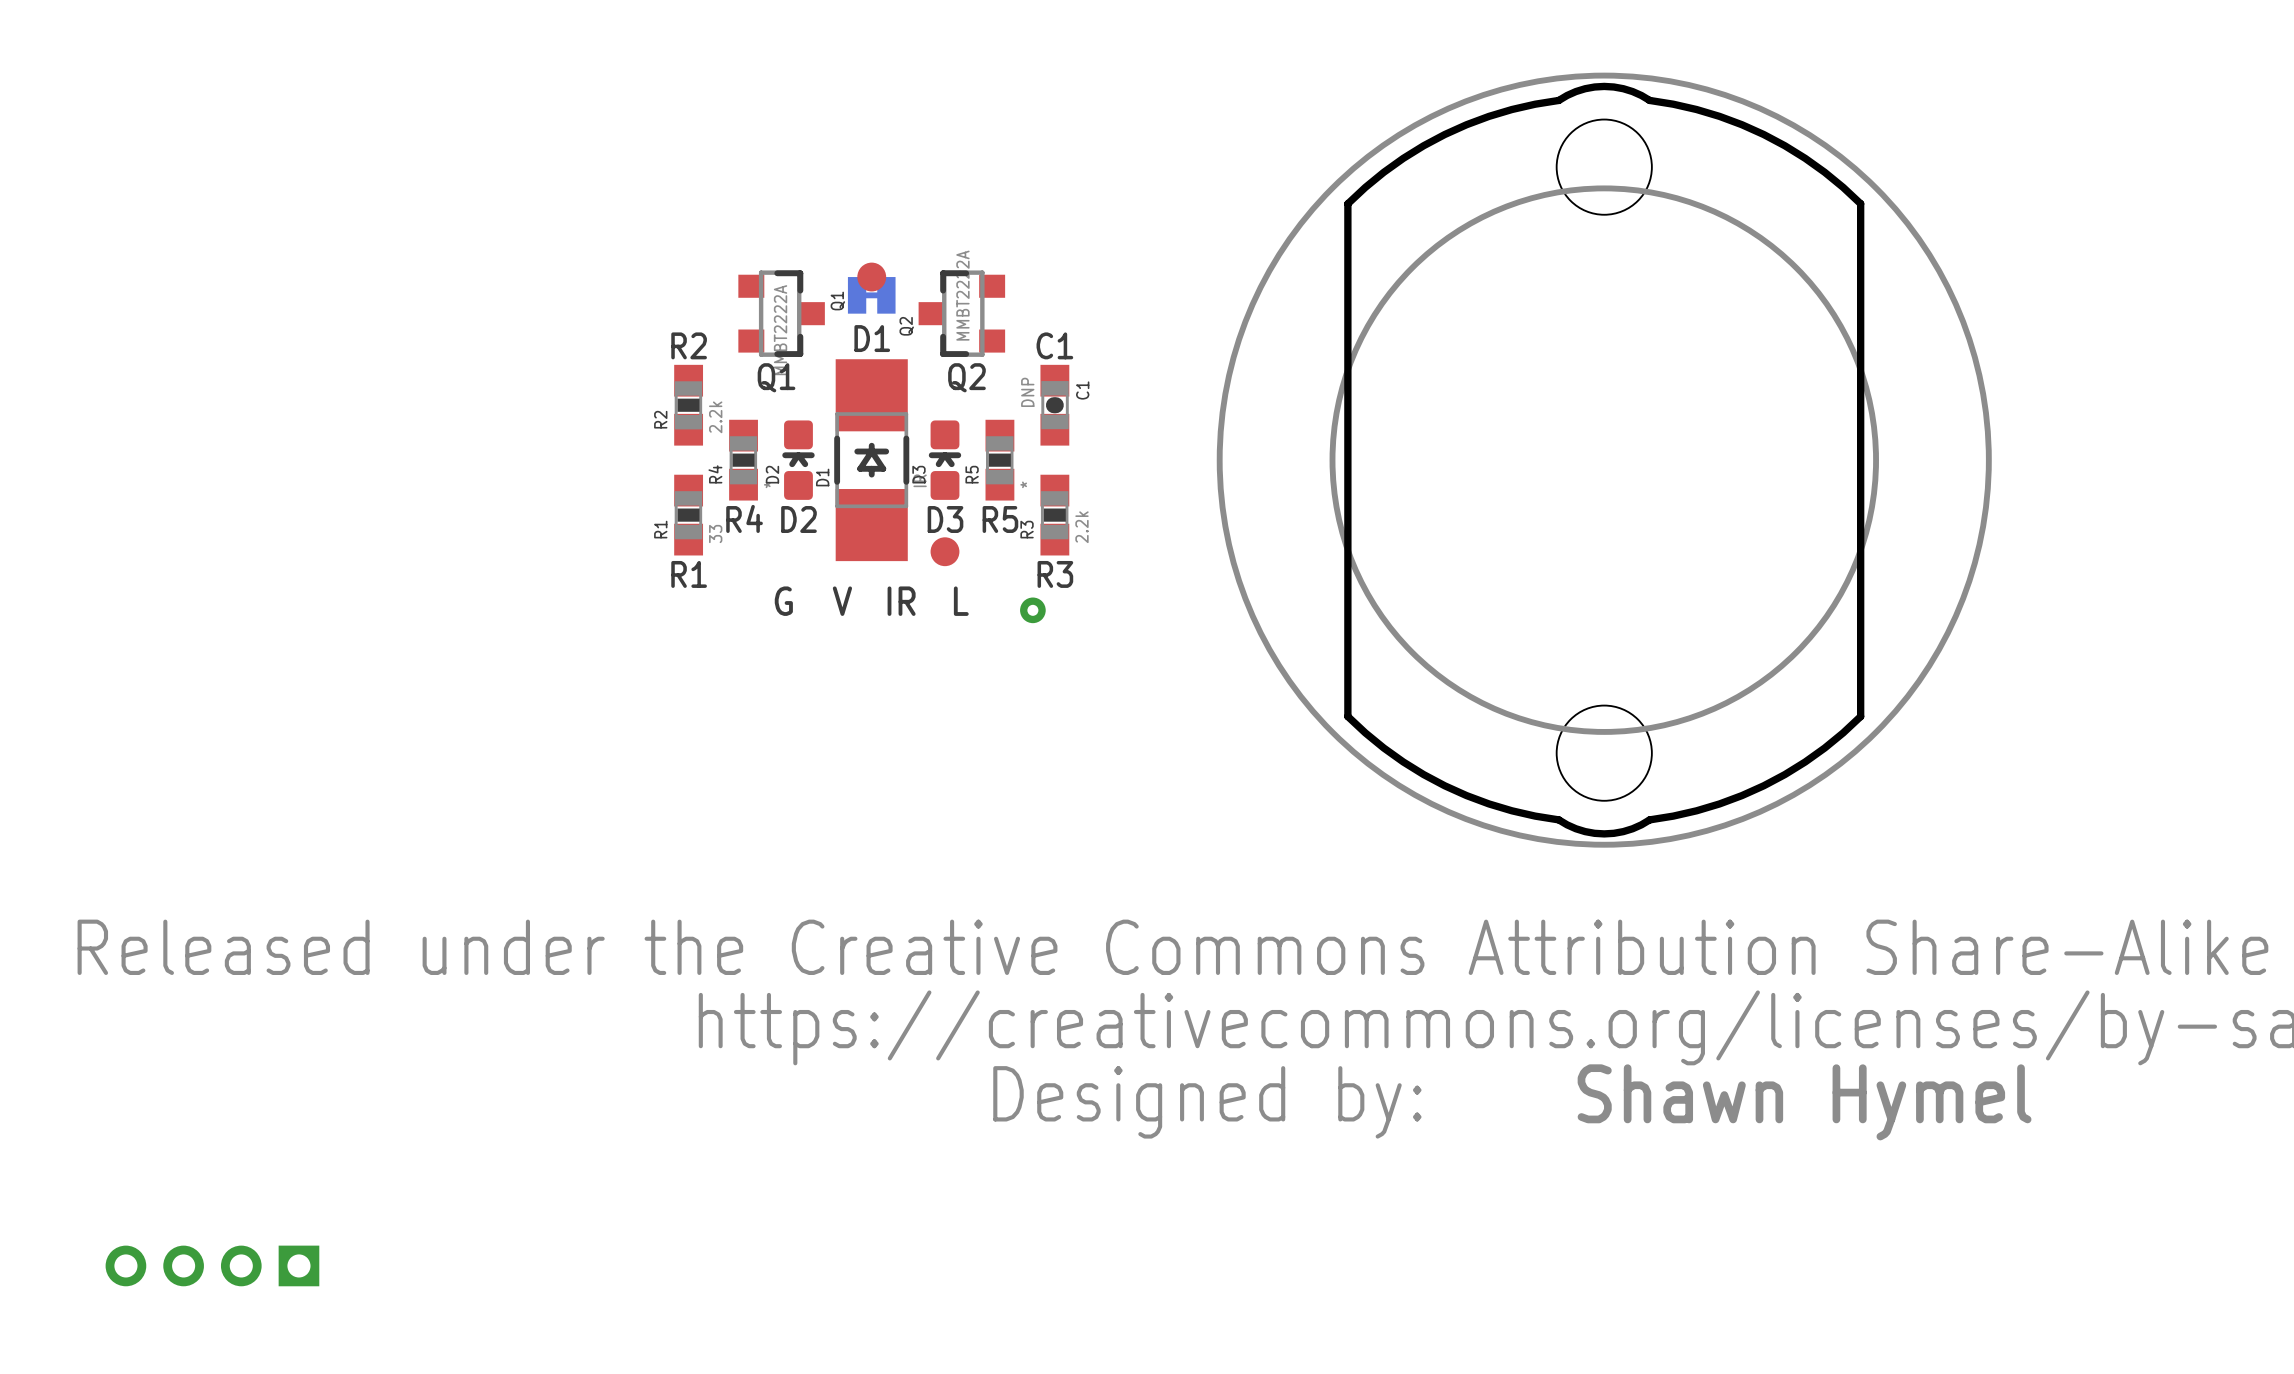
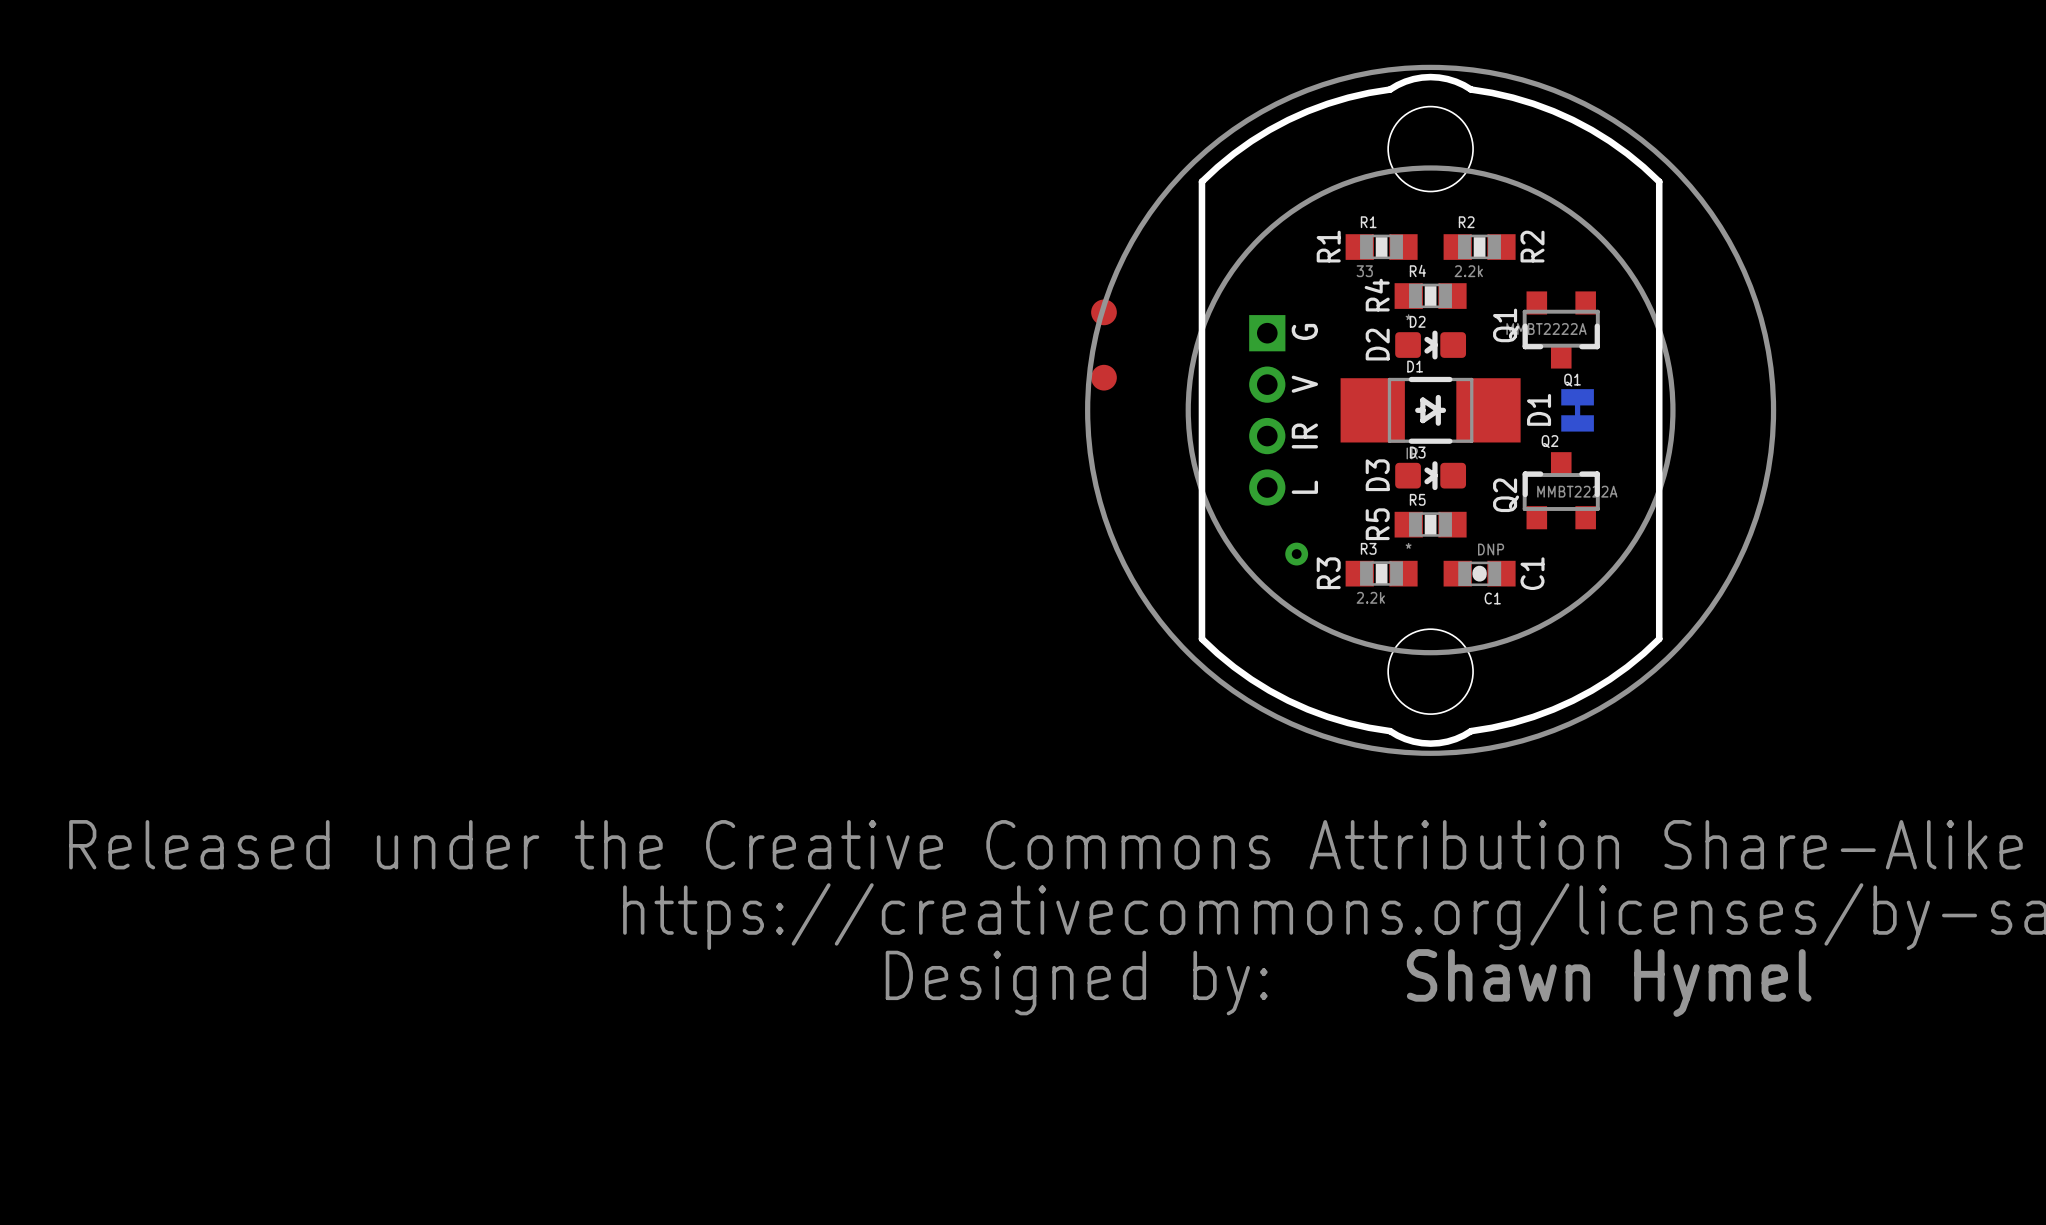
text: none -> R1 (1328, 246)
text: none -> R2 (1532, 246)
part: (871, 277) -> none
part: (871, 295) -> none
Q1 rotation: 0° (781, 313) -> 90° clockwise (1561, 329)
Q1 position: (781, 313) -> (1561, 329)
Q2 rotation: 0° (961, 313) -> 90° clockwise (1561, 490)
Q2 position: (961, 313) -> (1561, 490)
text: none -> R4 (1377, 295)
text: D1 (872, 338) -> none
text: R2 (689, 345) -> none
text rotation: 0° (1054, 345) -> 90° counterclockwise (1532, 573)
text position: C1 (1054, 345) -> C1 (1532, 573)
part: none -> (1103, 312)
text: none -> Q1 (1506, 325)
text: Q1 (776, 377) -> none
text: Q2 (966, 377) -> none
text: none -> D2 (1377, 344)
R2 rotation: 0° (688, 405) -> 90° clockwise (1479, 247)
R2 position: (688, 405) -> (1479, 247)
C1 rotation: 0° (1054, 405) -> 90° clockwise (1479, 573)
C1 position: (1054, 405) -> (1479, 573)
part: none -> (1103, 377)
text: none -> D1 (1539, 409)
R4 rotation: 0° (743, 460) -> 90° clockwise (1430, 296)
R4 position: (743, 460) -> (1430, 296)
D2 rotation: 0° (798, 460) -> 90° clockwise (1430, 345)
D2 position: (798, 460) -> (1430, 345)
D1 rotation: 0° (871, 460) -> 90° clockwise (1430, 410)
D1 position: (871, 460) -> (1430, 410)
D3 rotation: 0° (944, 460) -> 90° clockwise (1430, 475)
D3 position: (944, 460) -> (1430, 475)
R5 rotation: 0° (999, 460) -> 90° clockwise (1430, 524)
R5 position: (999, 460) -> (1430, 524)
part: none -> (1267, 410)
part: none -> (1577, 410)
R1 rotation: 0° (688, 515) -> 90° clockwise (1381, 247)
R1 position: (688, 515) -> (1381, 247)
R3 rotation: 0° (1054, 515) -> 90° clockwise (1381, 573)
R3 position: (1054, 515) -> (1381, 573)
text: R4 (744, 518) -> none
text: D2 (798, 519) -> none
text rotation: 0° (945, 519) -> 90° counterclockwise (1377, 475)
text position: D3 (945, 519) -> D3 (1377, 475)
text rotation: 0° (1000, 519) -> 90° counterclockwise (1377, 524)
text position: R5 (1000, 519) -> R5 (1377, 524)
part: (944, 551) -> none
text: none -> Q2 (1506, 495)
text: R1 (689, 574) -> none
text rotation: 0° (1055, 574) -> 90° counterclockwise (1328, 573)
text position: R3 (1055, 574) -> R3 (1328, 573)
text rotation: 0° (783, 601) -> 90° counterclockwise (1304, 331)
text position: G (783, 601) -> G (1304, 331)
text rotation: 0° (842, 601) -> 90° counterclockwise (1304, 384)
text position: V (842, 601) -> V (1304, 384)
text rotation: 0° (901, 601) -> 90° counterclockwise (1304, 435)
text position: IR (901, 601) -> IR (1304, 435)
text rotation: 0° (961, 601) -> 90° counterclockwise (1304, 487)
text position: L (961, 601) -> L (1304, 487)
via: (1032, 610) -> none
via: none -> (1296, 554)
part: (212, 1265) -> none

